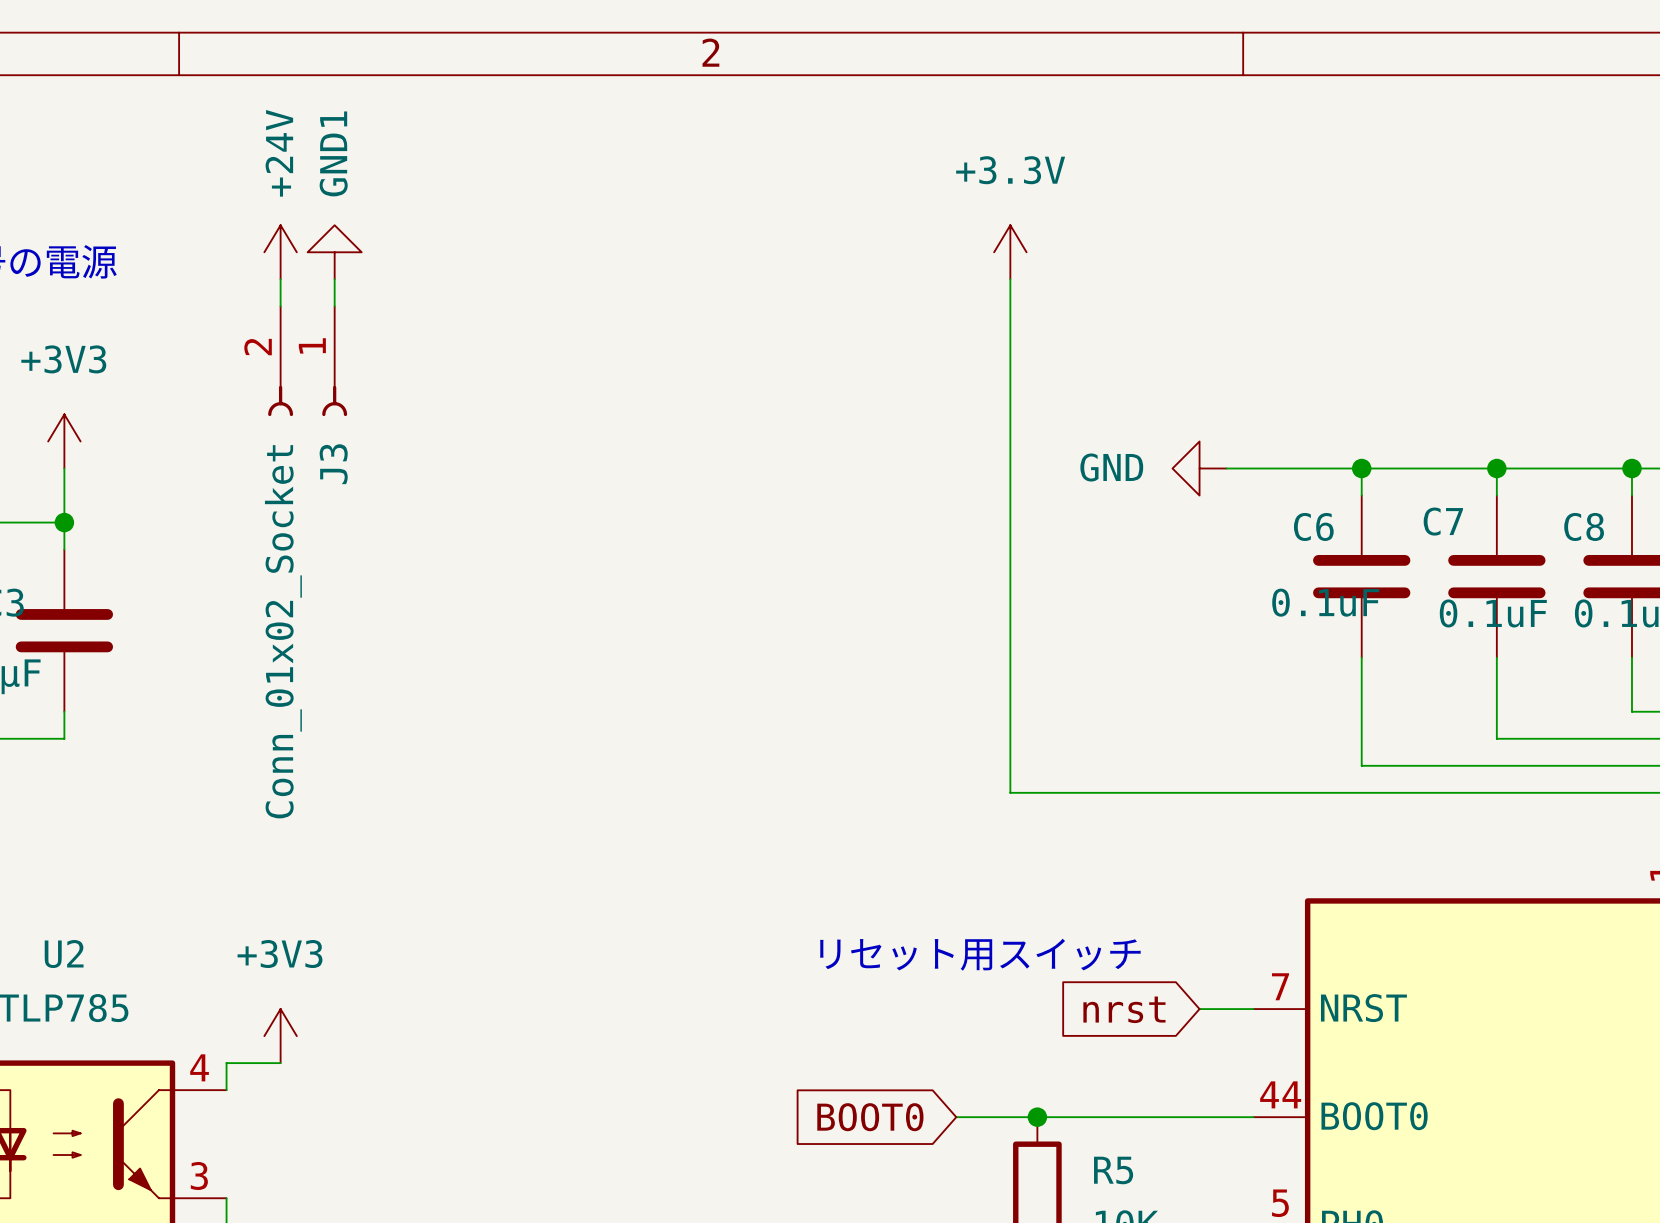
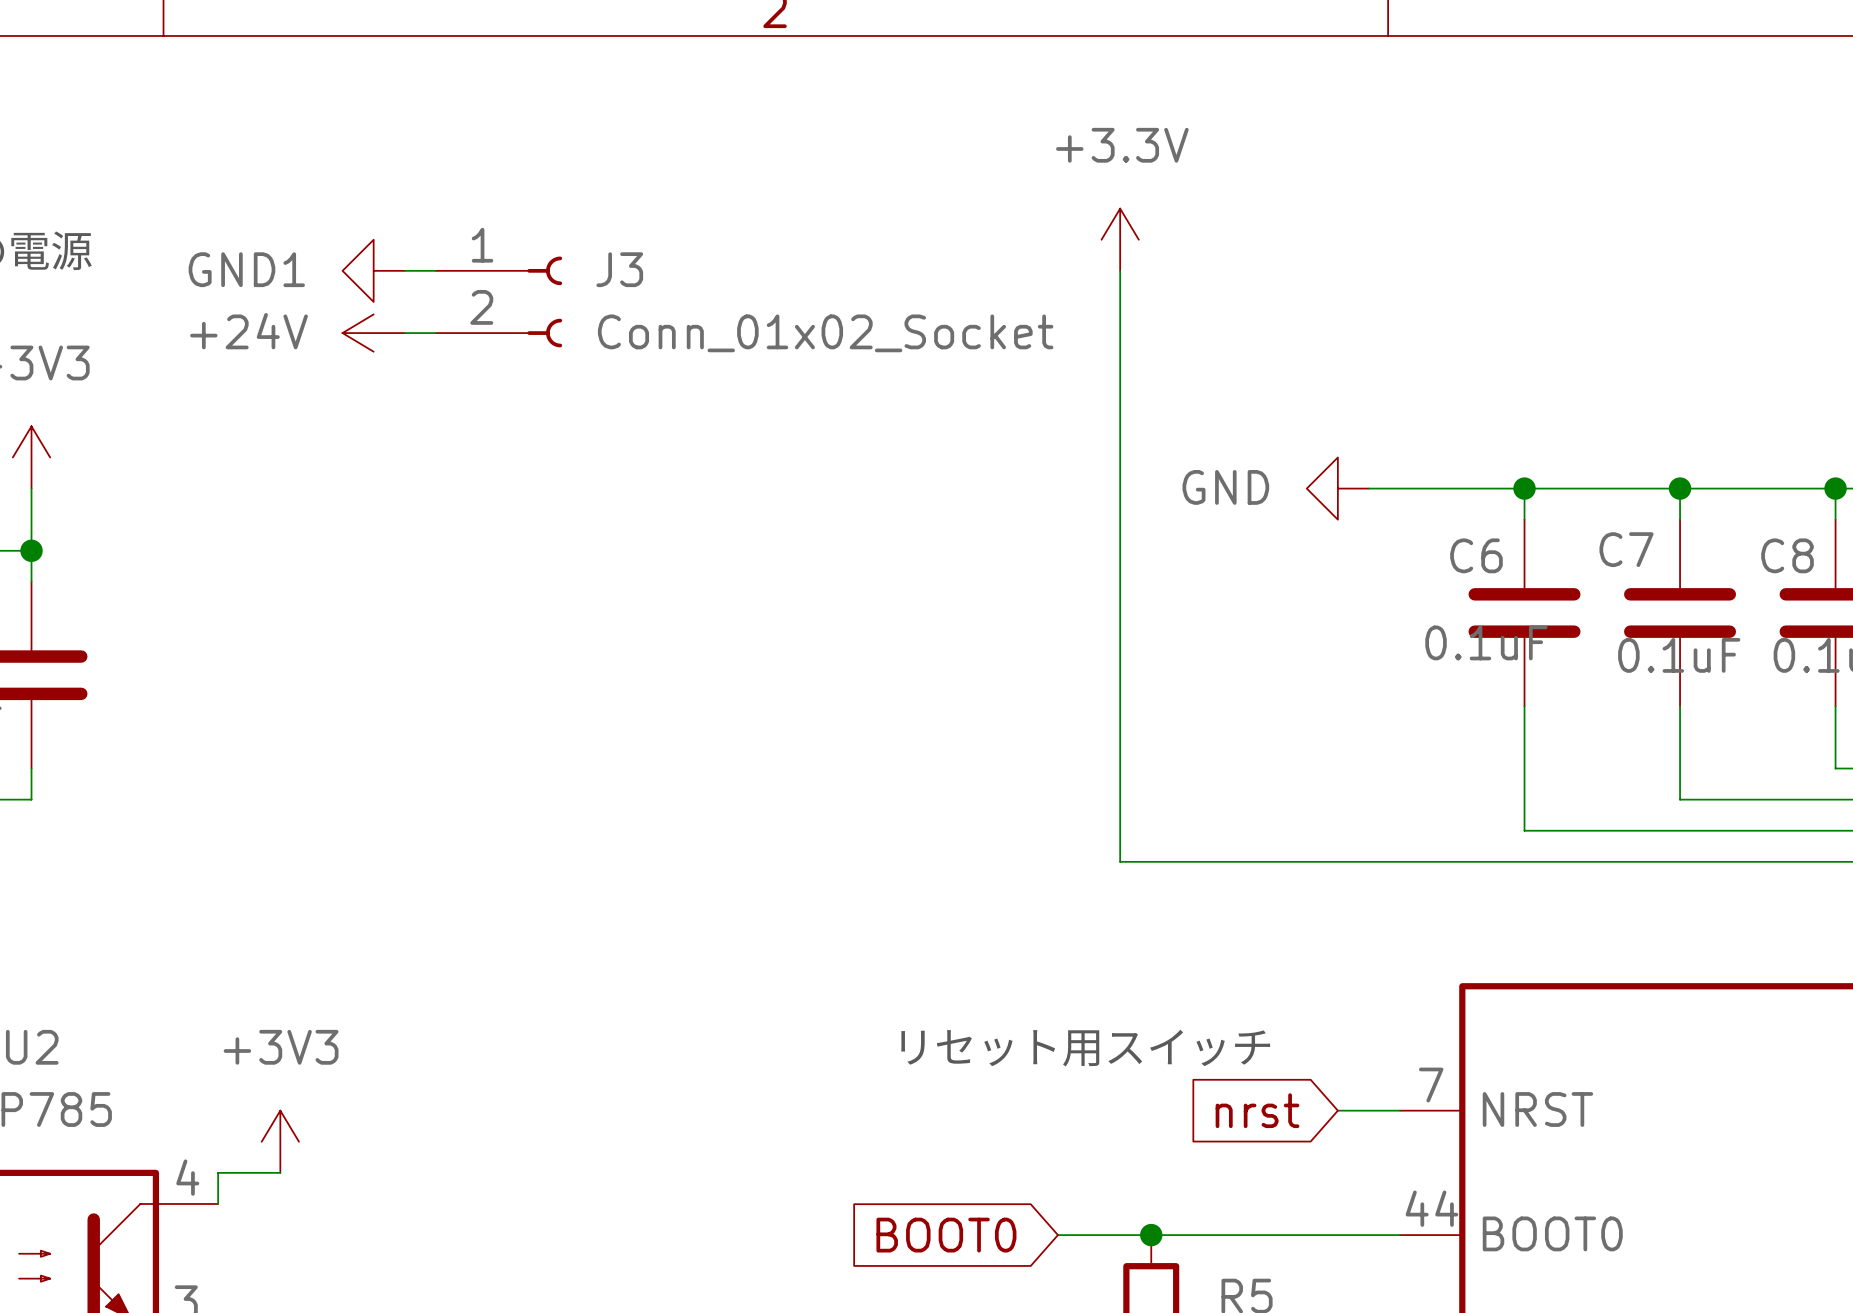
power symbol rotation: 0° (280, 252) -> 90° counterclockwise (373, 333)
power symbol position: +24V (280, 252) -> +24V (373, 333)
power symbol rotation: 0° (334, 252) -> 90° counterclockwise (373, 270)
power symbol position: GND1 (334, 252) -> GND1 (373, 270)
wire: (280, 279) (280, 306) -> none
wire: (334, 279) (334, 306) -> none
wire: none -> (404, 270) (435, 270)
wire: none -> (404, 333) (435, 333)
J3 position: (307, 361) -> (499, 301)
J3 rotation: 0° (307, 400) -> 90° counterclockwise (544, 301)

